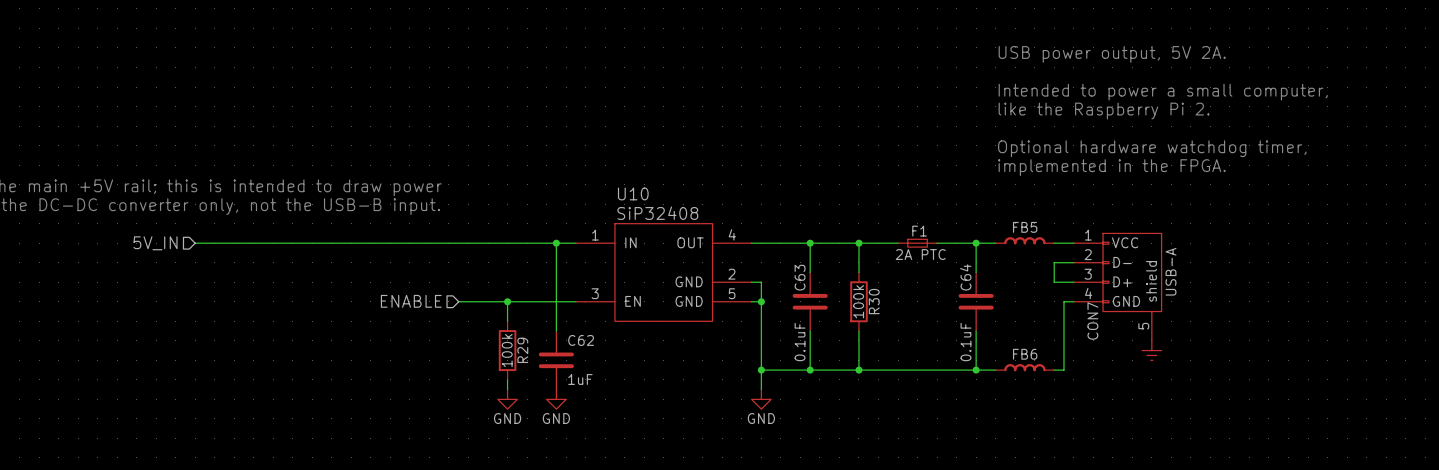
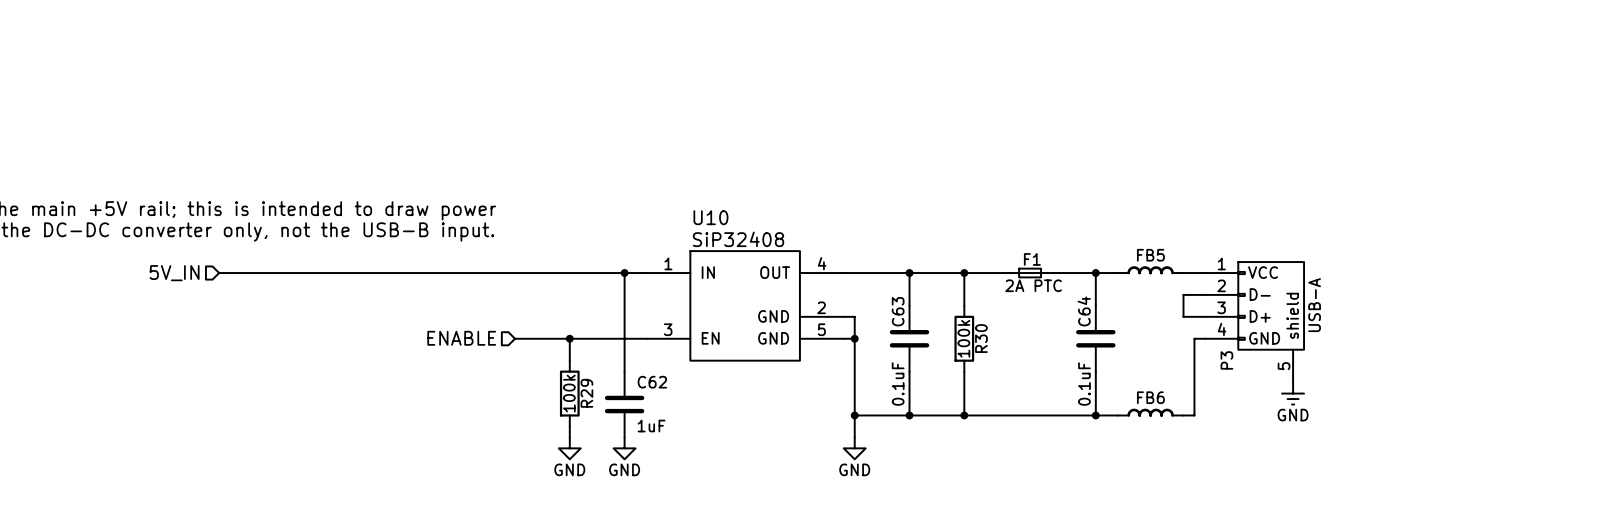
text: USB power output, 5V 2A. (1112, 54) -> none
text: Intended to power a small computer, (1163, 92) -> none
text: like the Raspberry Pi 2. (1104, 111) -> none
text: Optional hardware watchdog timer, (1152, 148) -> none
text: implemented in the FPGA. (1111, 167) -> none
CON7 name: CON7 (1092, 321) -> P3 (1226, 360)
power symbol text: none -> GND (1293, 415)

